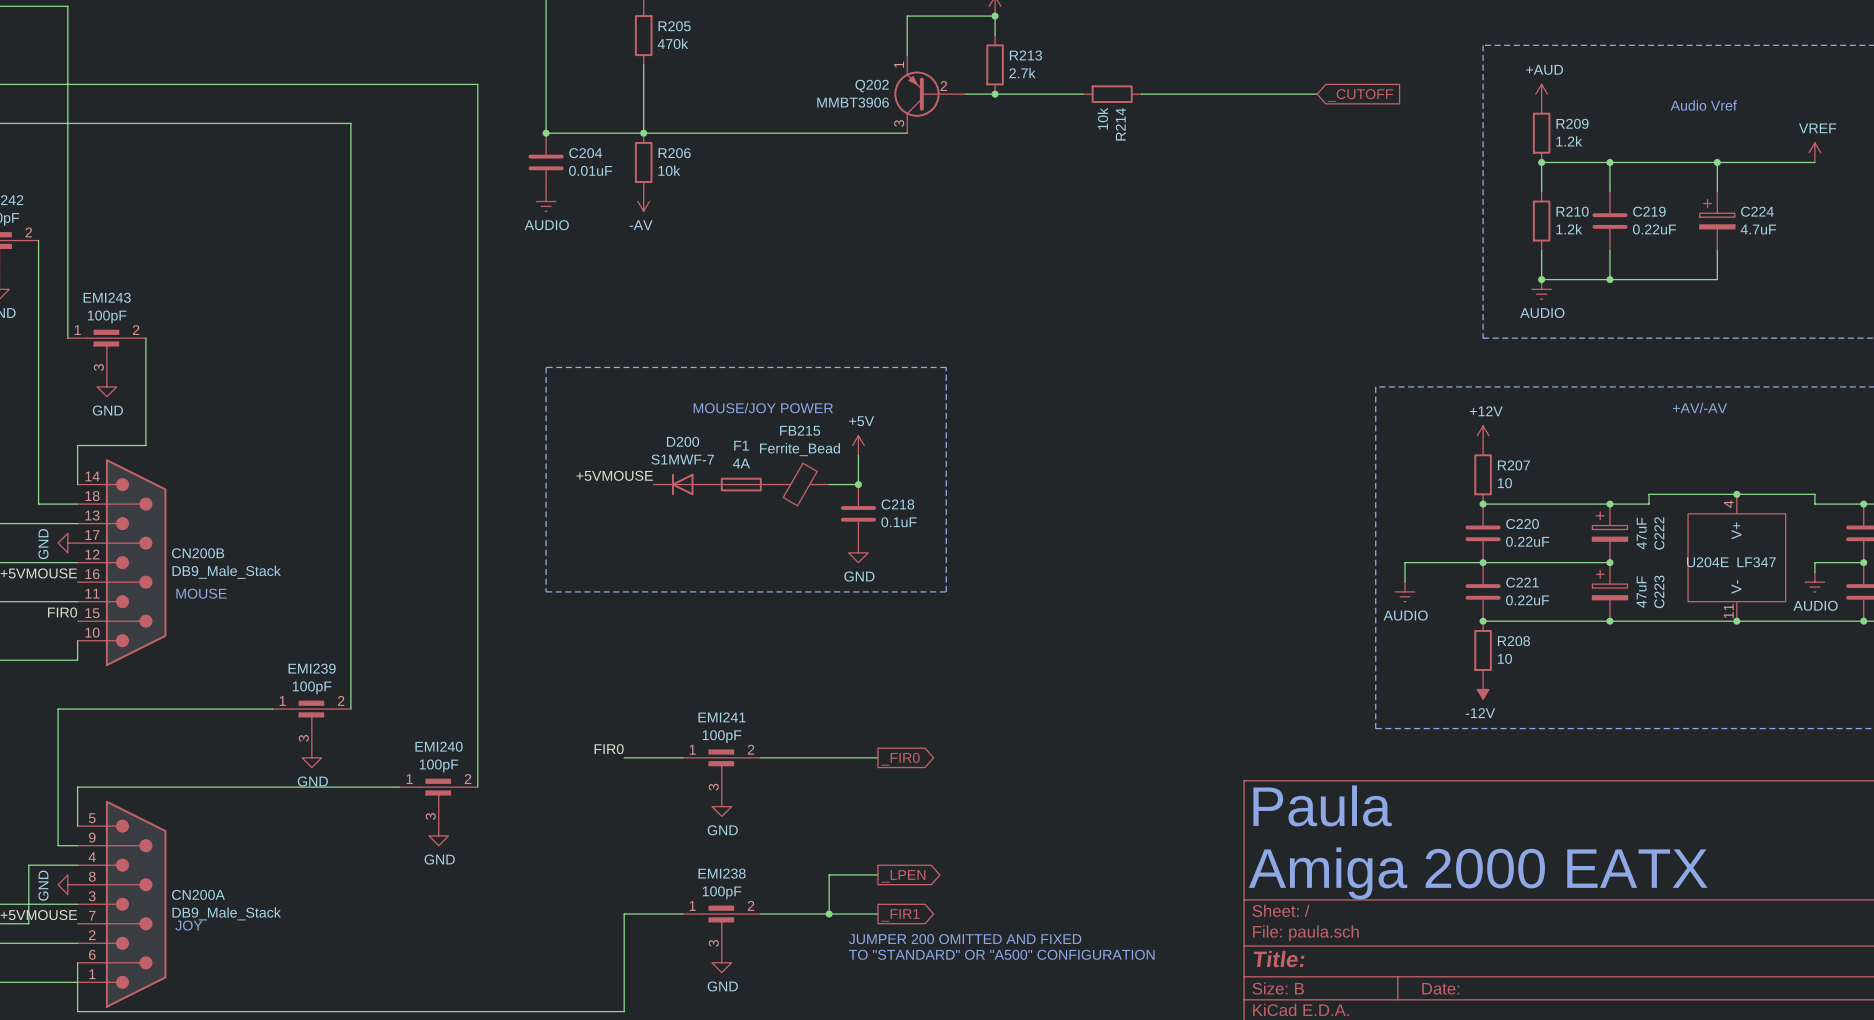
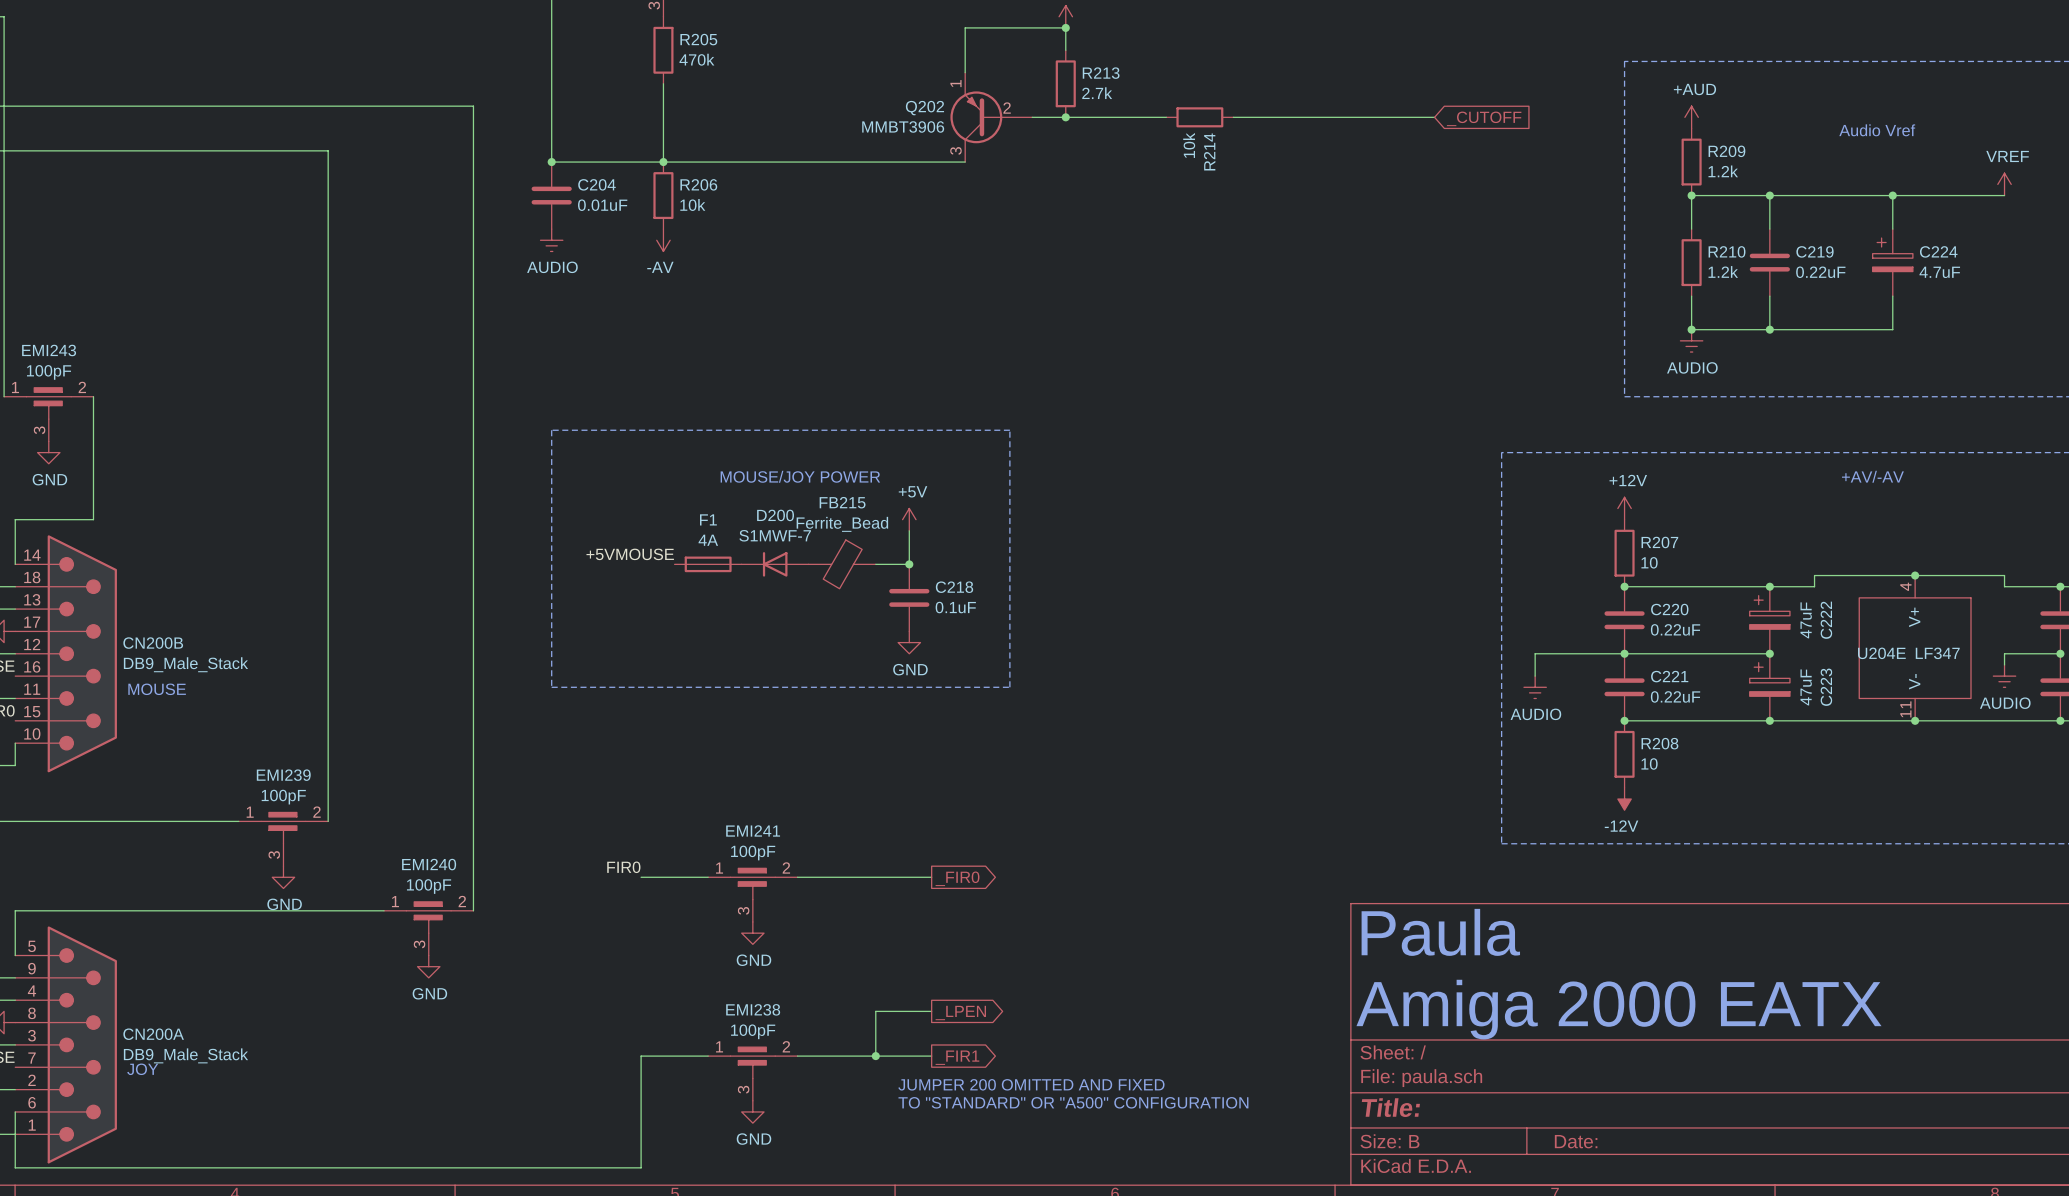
D200 position: (682, 484) -> (775, 564)
F1 position: (741, 484) -> (708, 564)

